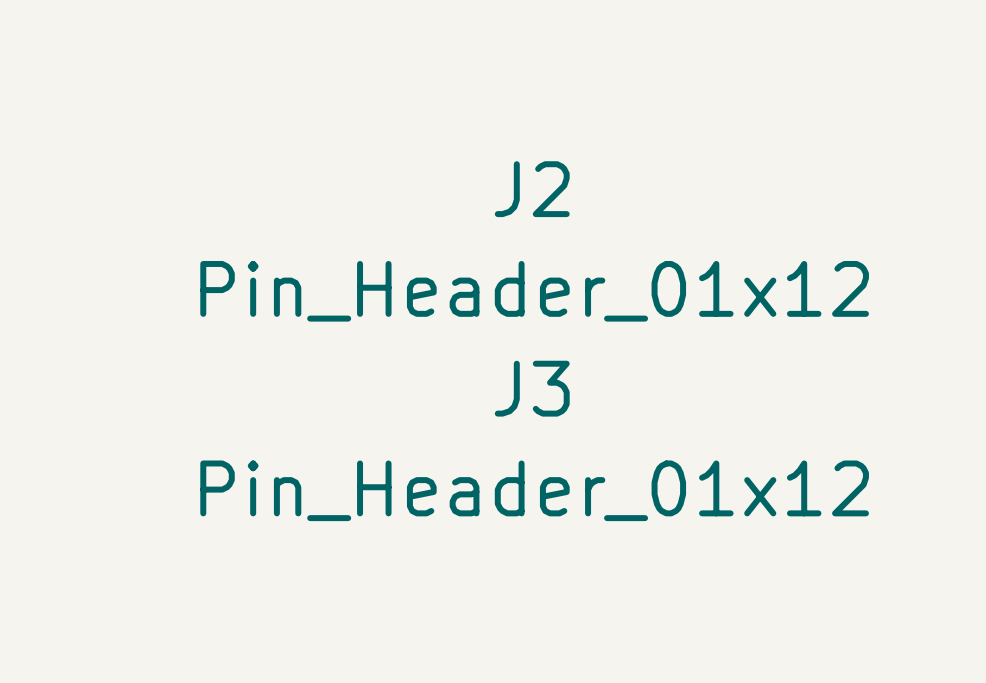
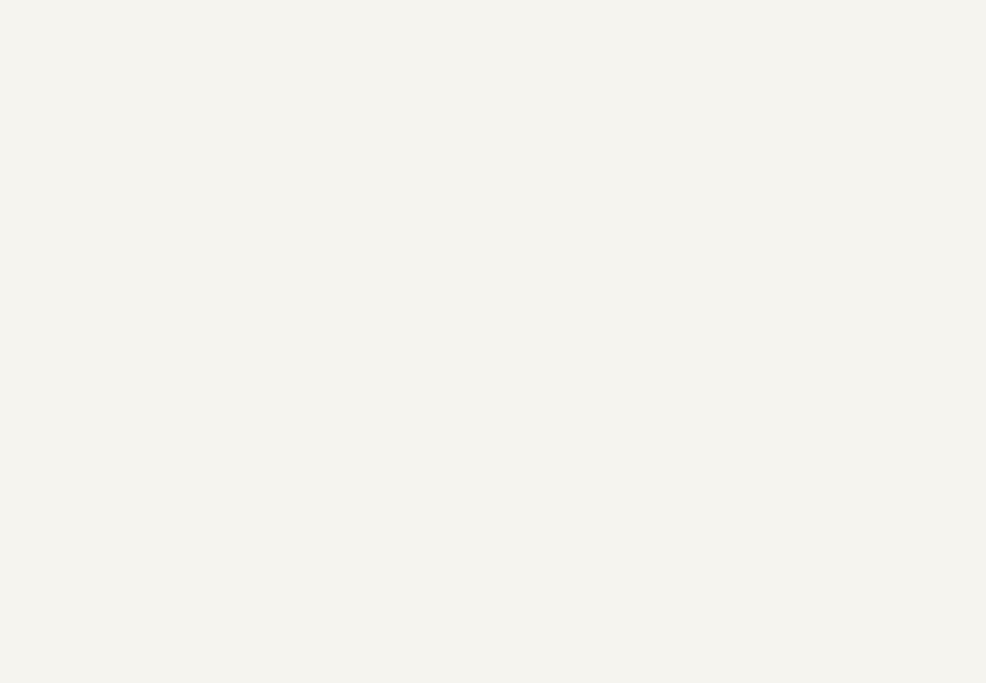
J2: Pin_Header_01x12 (534, 241) -> none
J3: Pin_Header_01x12 (534, 440) -> none

